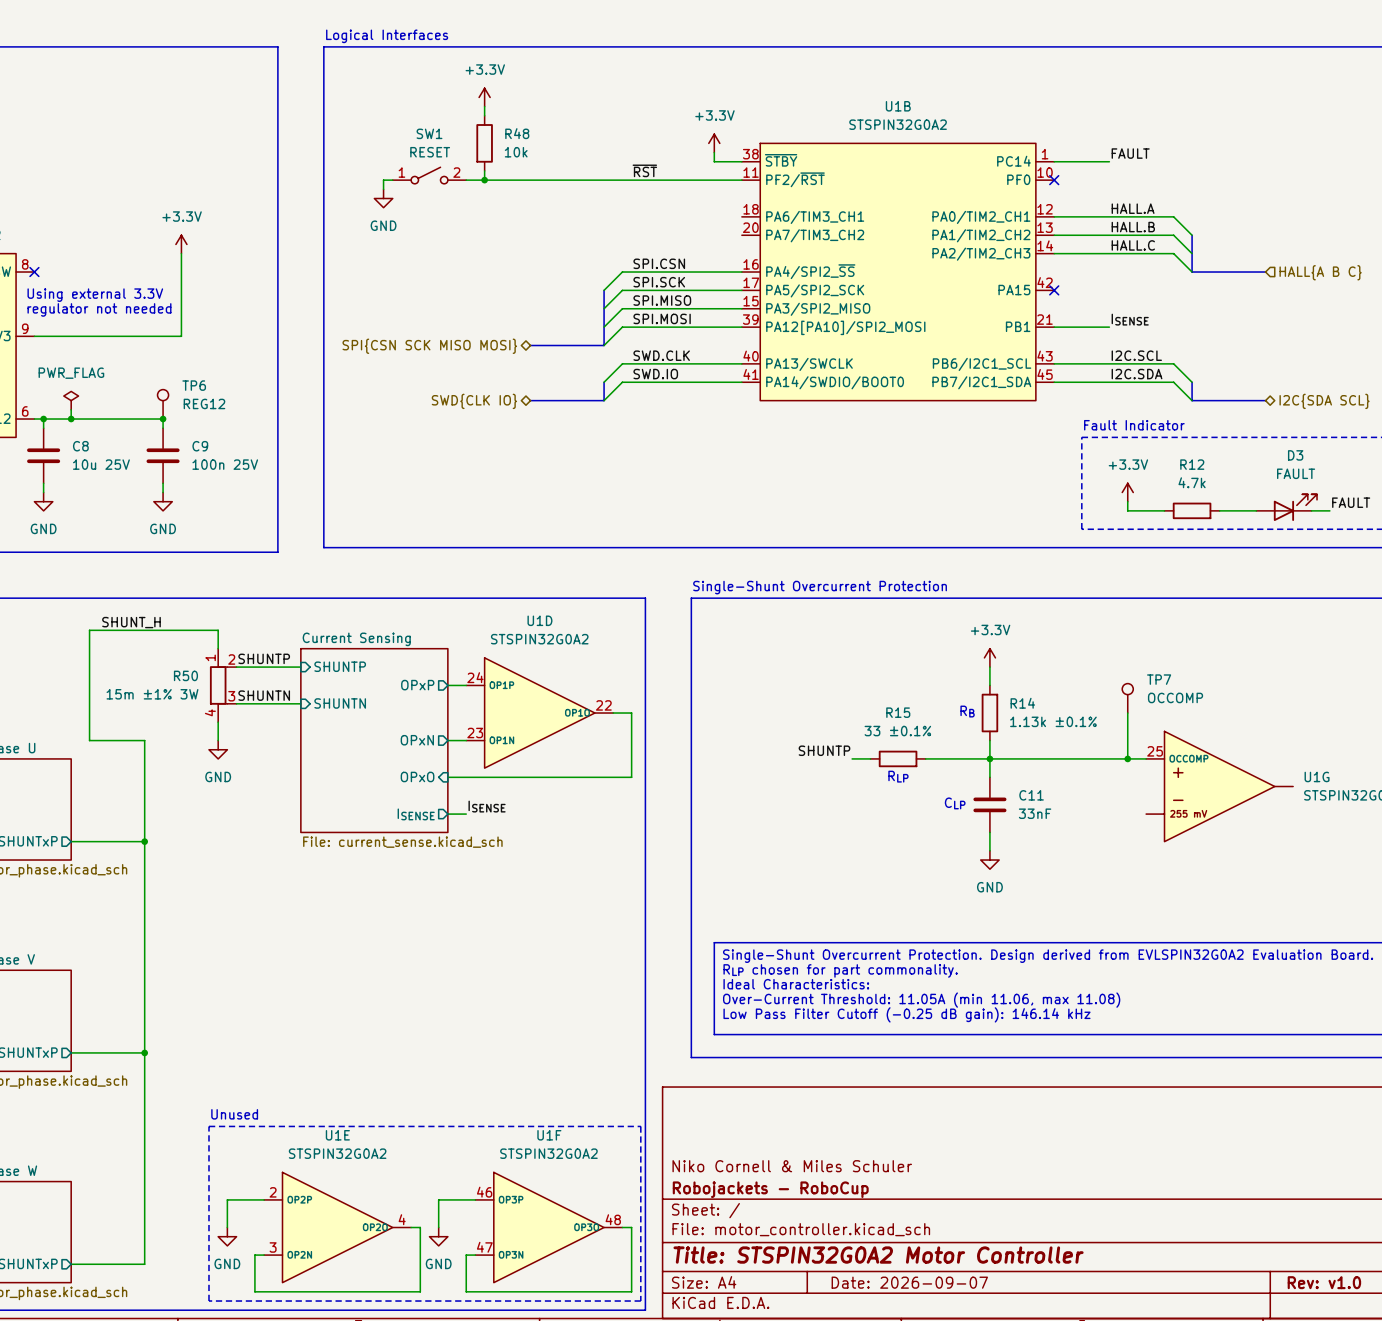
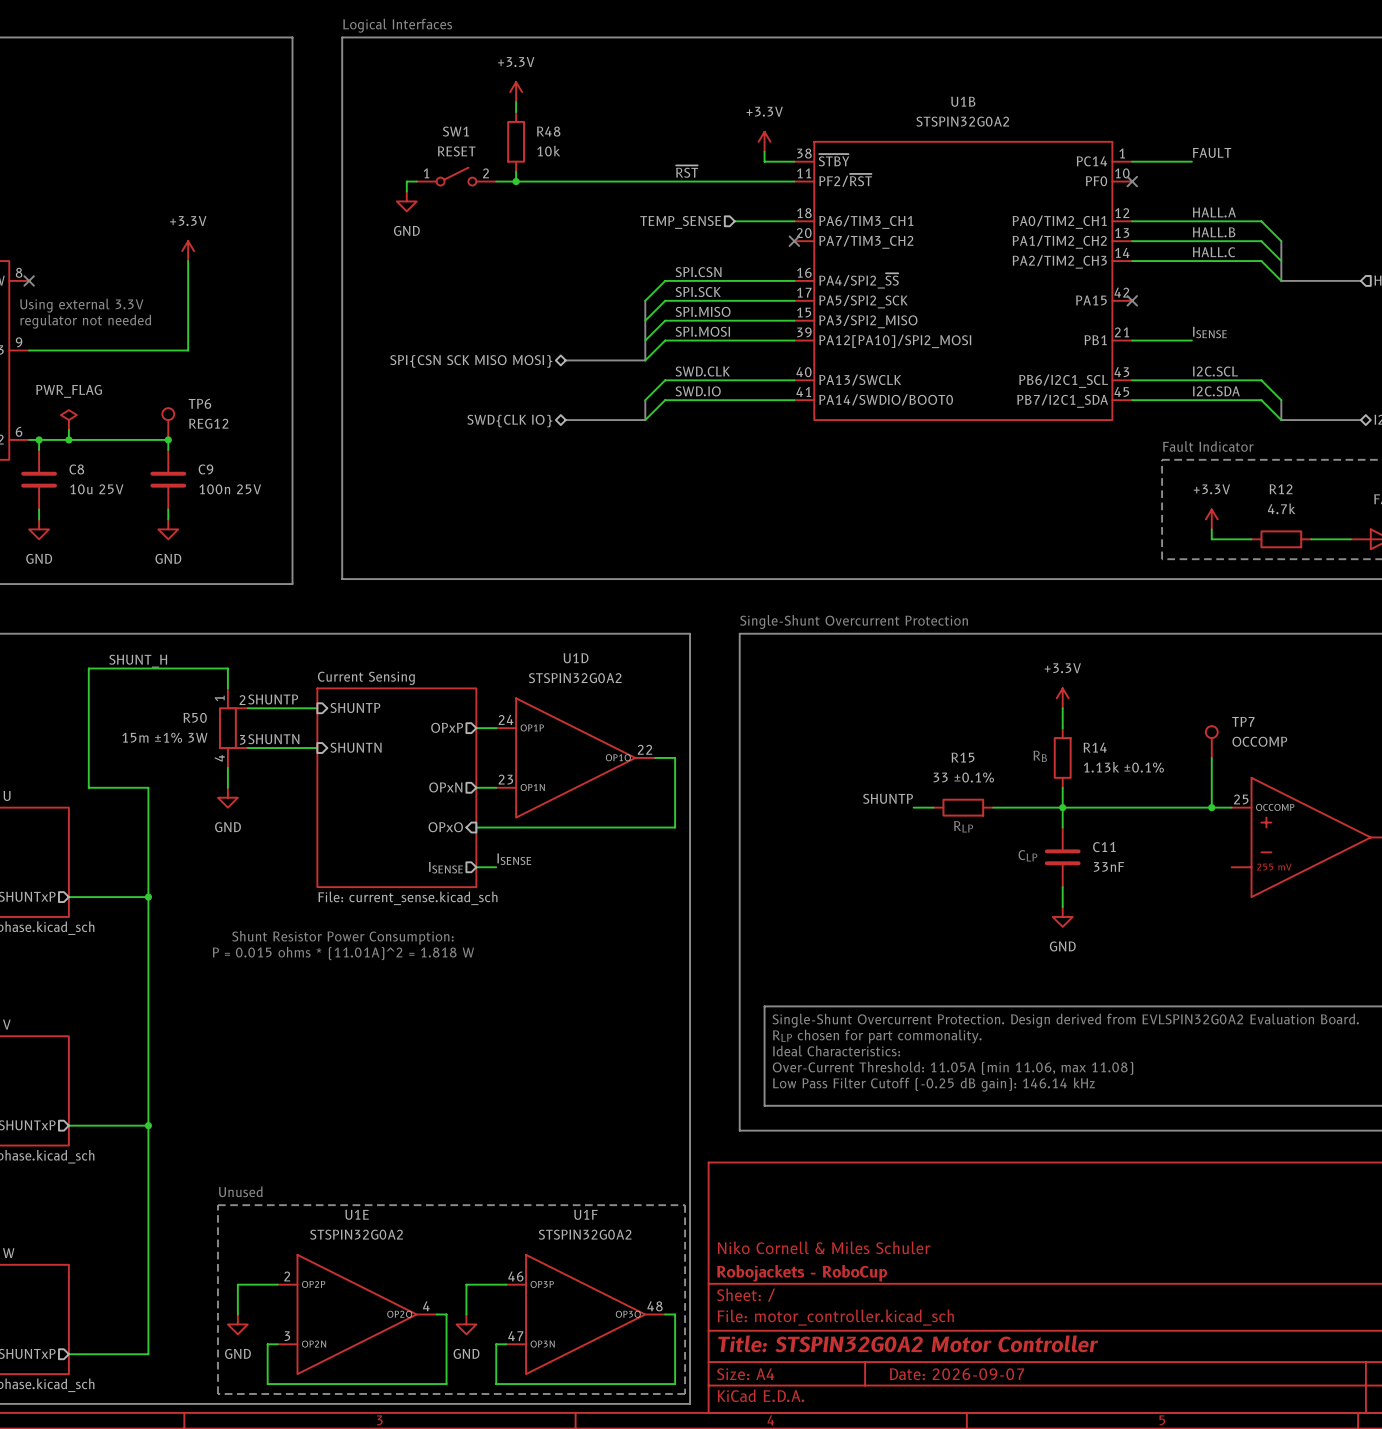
hierarchical label: none -> TEMP_SENSE (680, 222)
wire: none -> (734, 221) (794, 221)
no-connect mark: none -> (794, 241)
text: none -> Shunt Resistor Power Consumption: (342, 937)
text: none -> P = 0.015 ohms * (11.01A)^2 = 1.818 W (343, 953)

